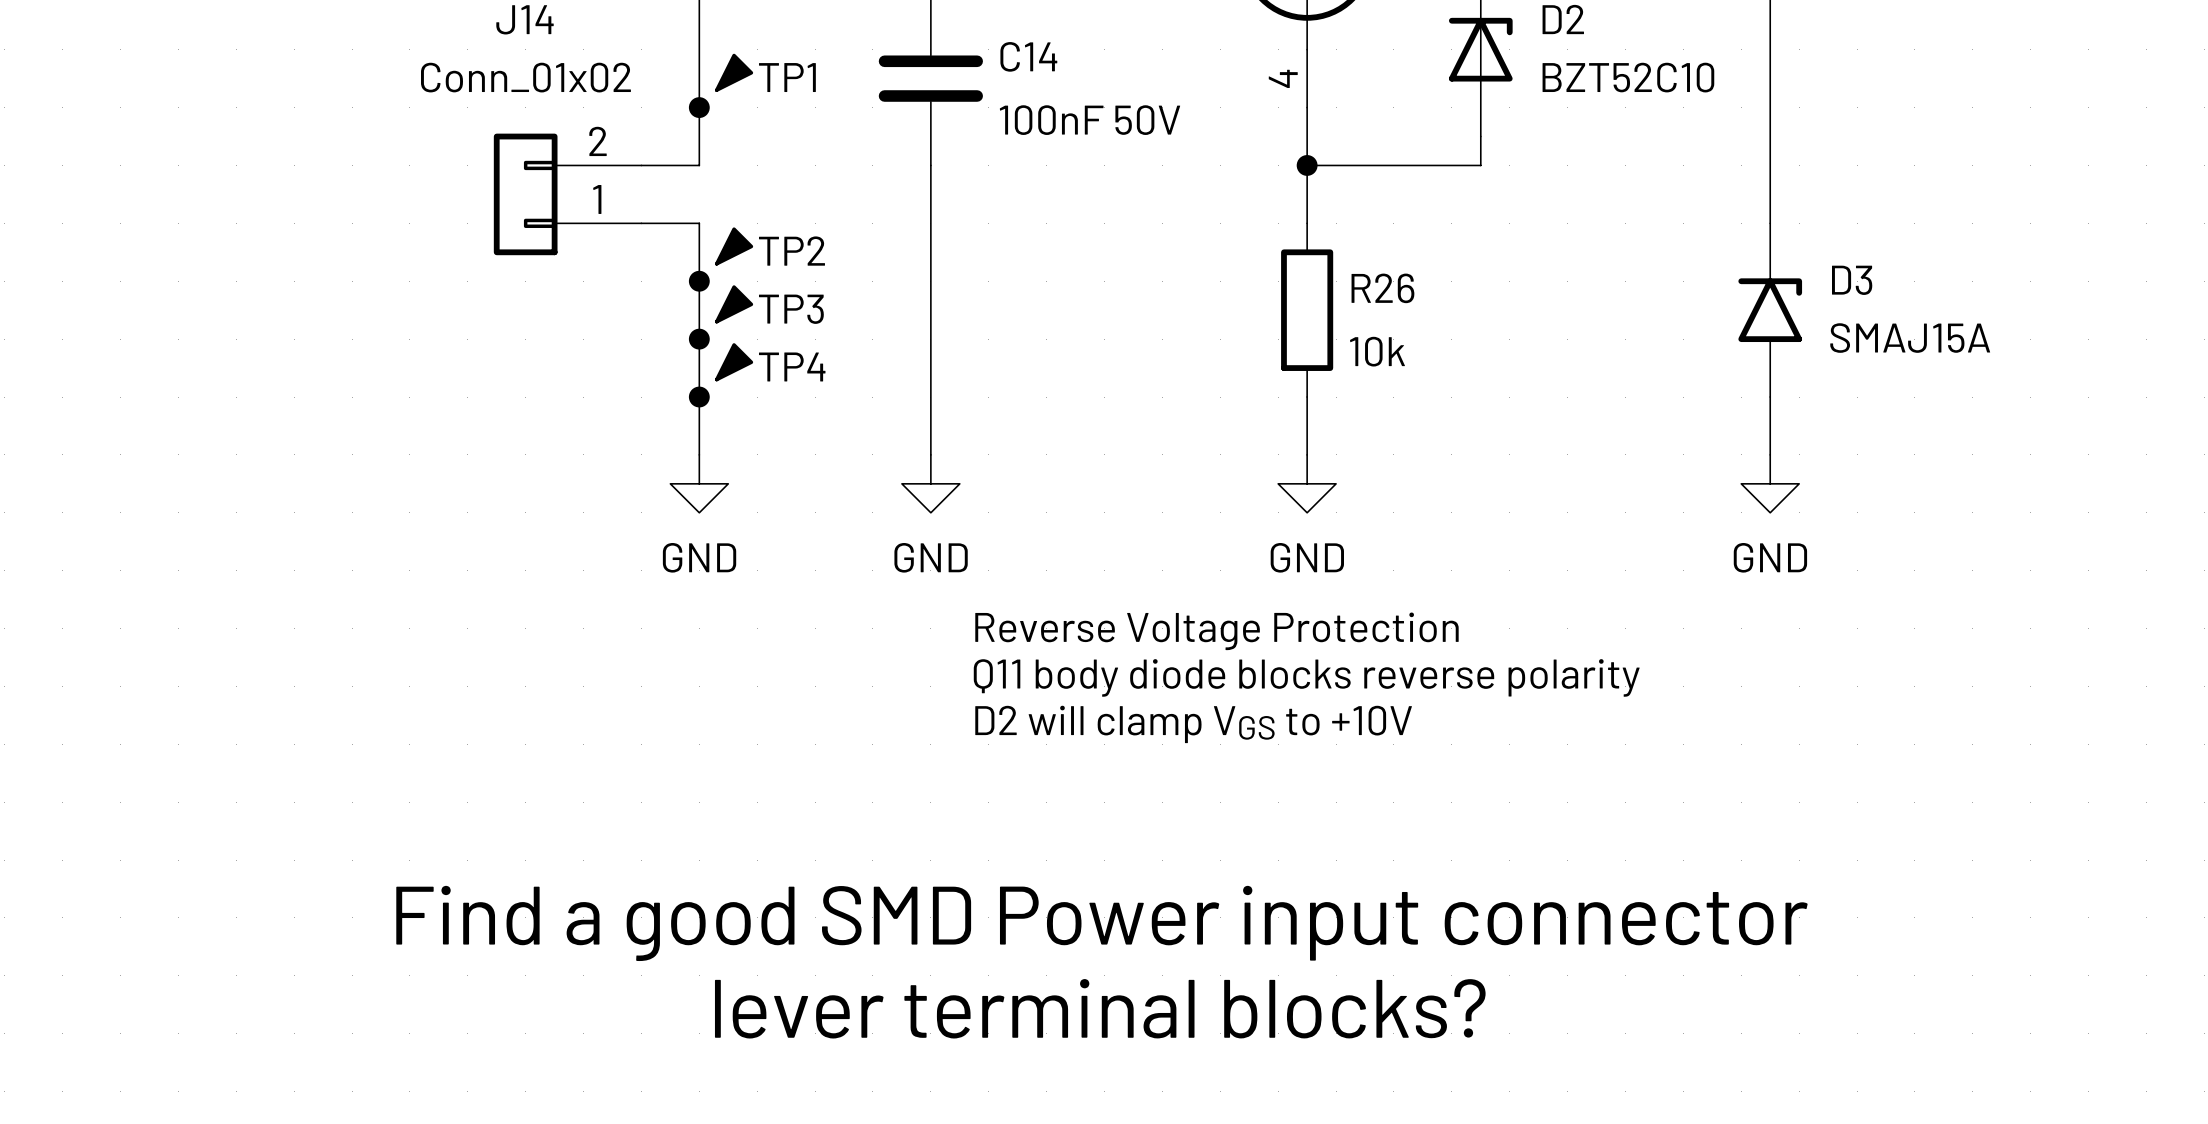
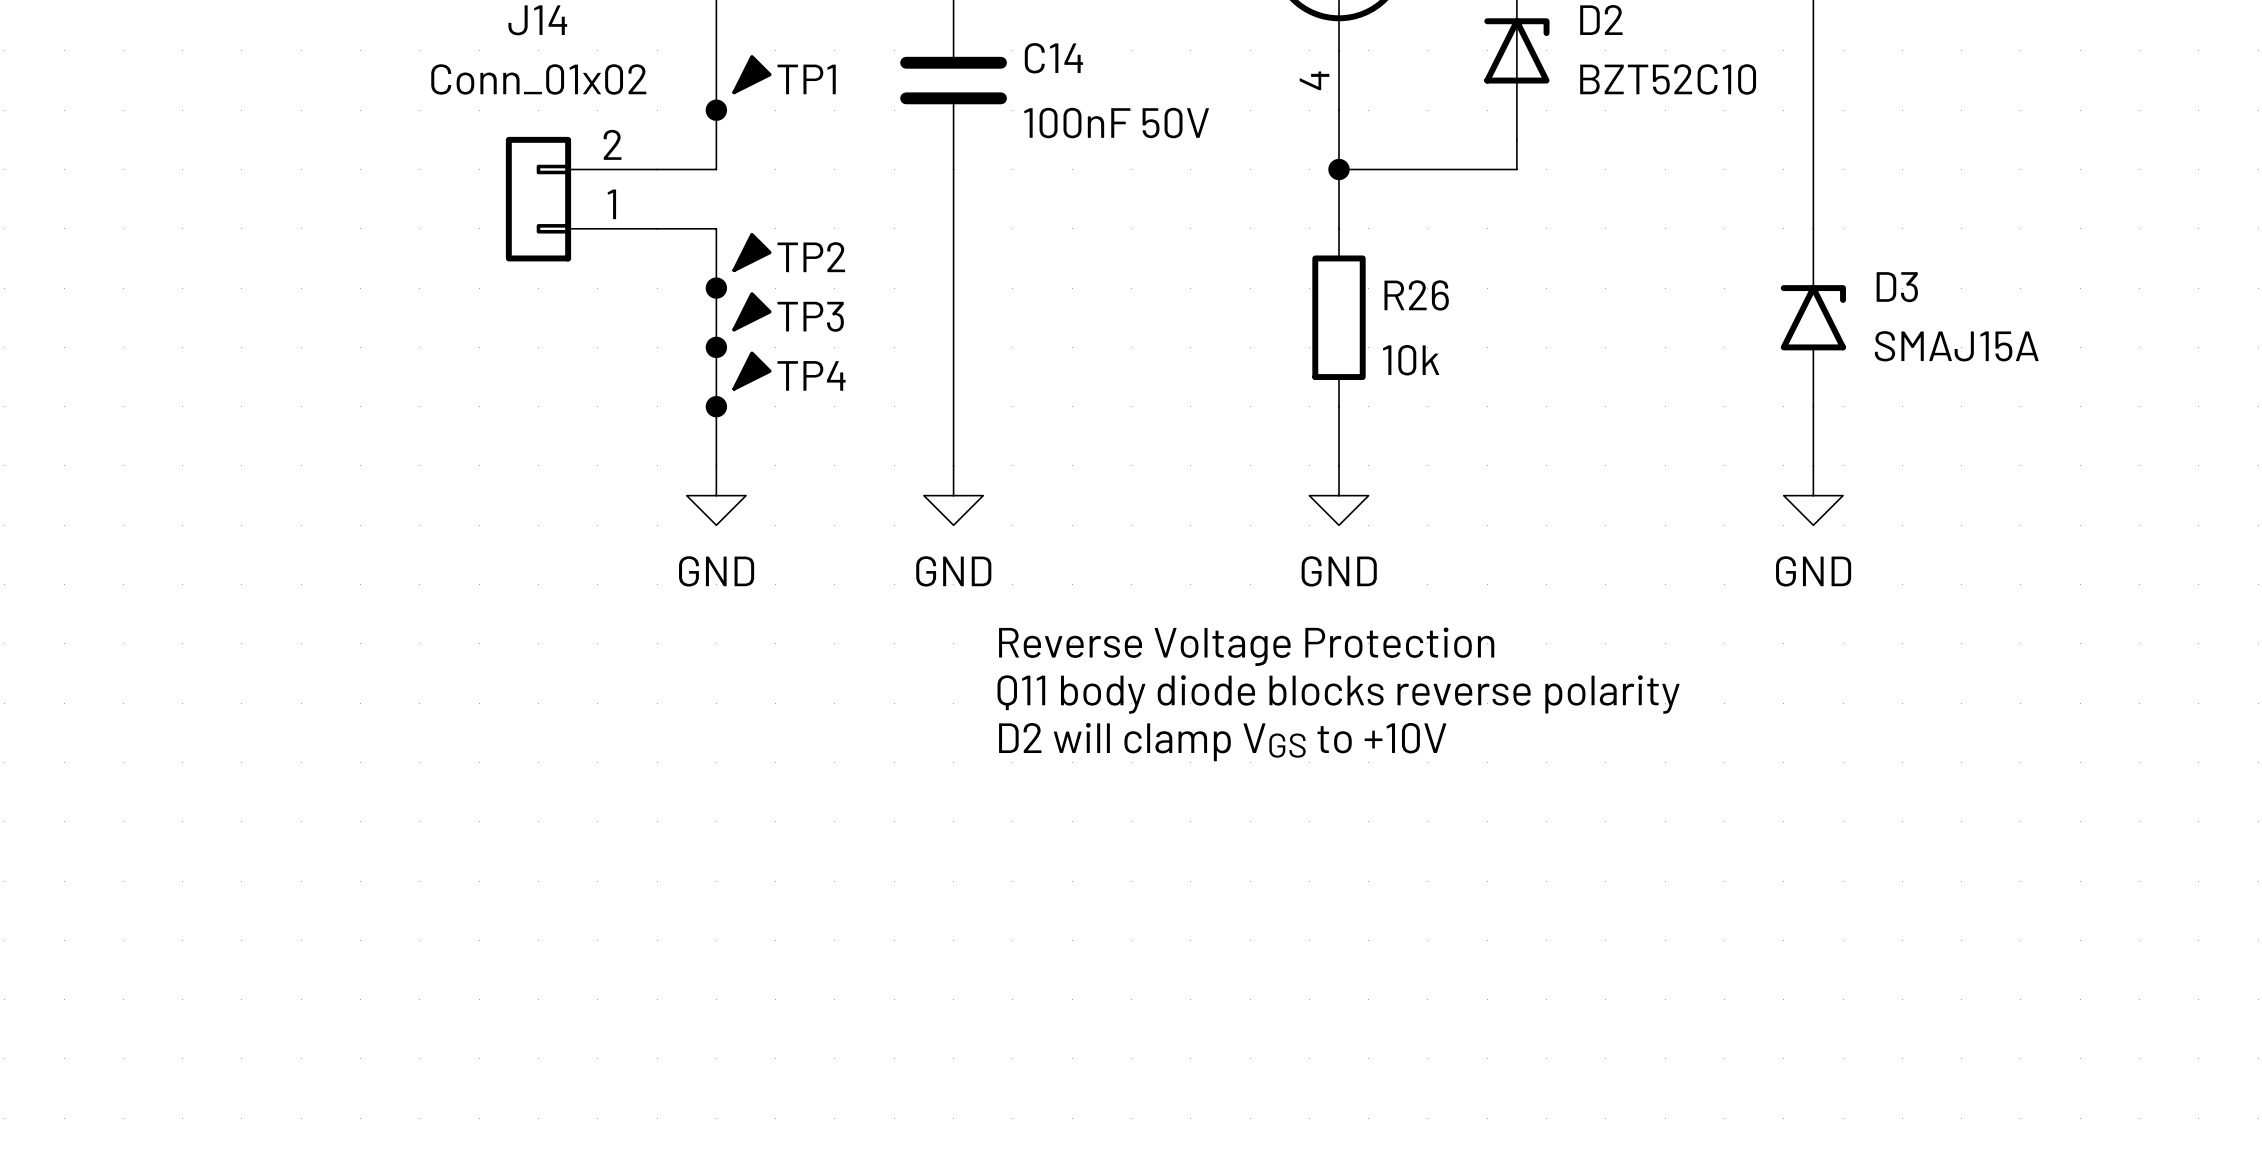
text: Find a good SMD Power input connector (1102, 923) -> none
text: lever terminal blocks? (1100, 1008) -> none

